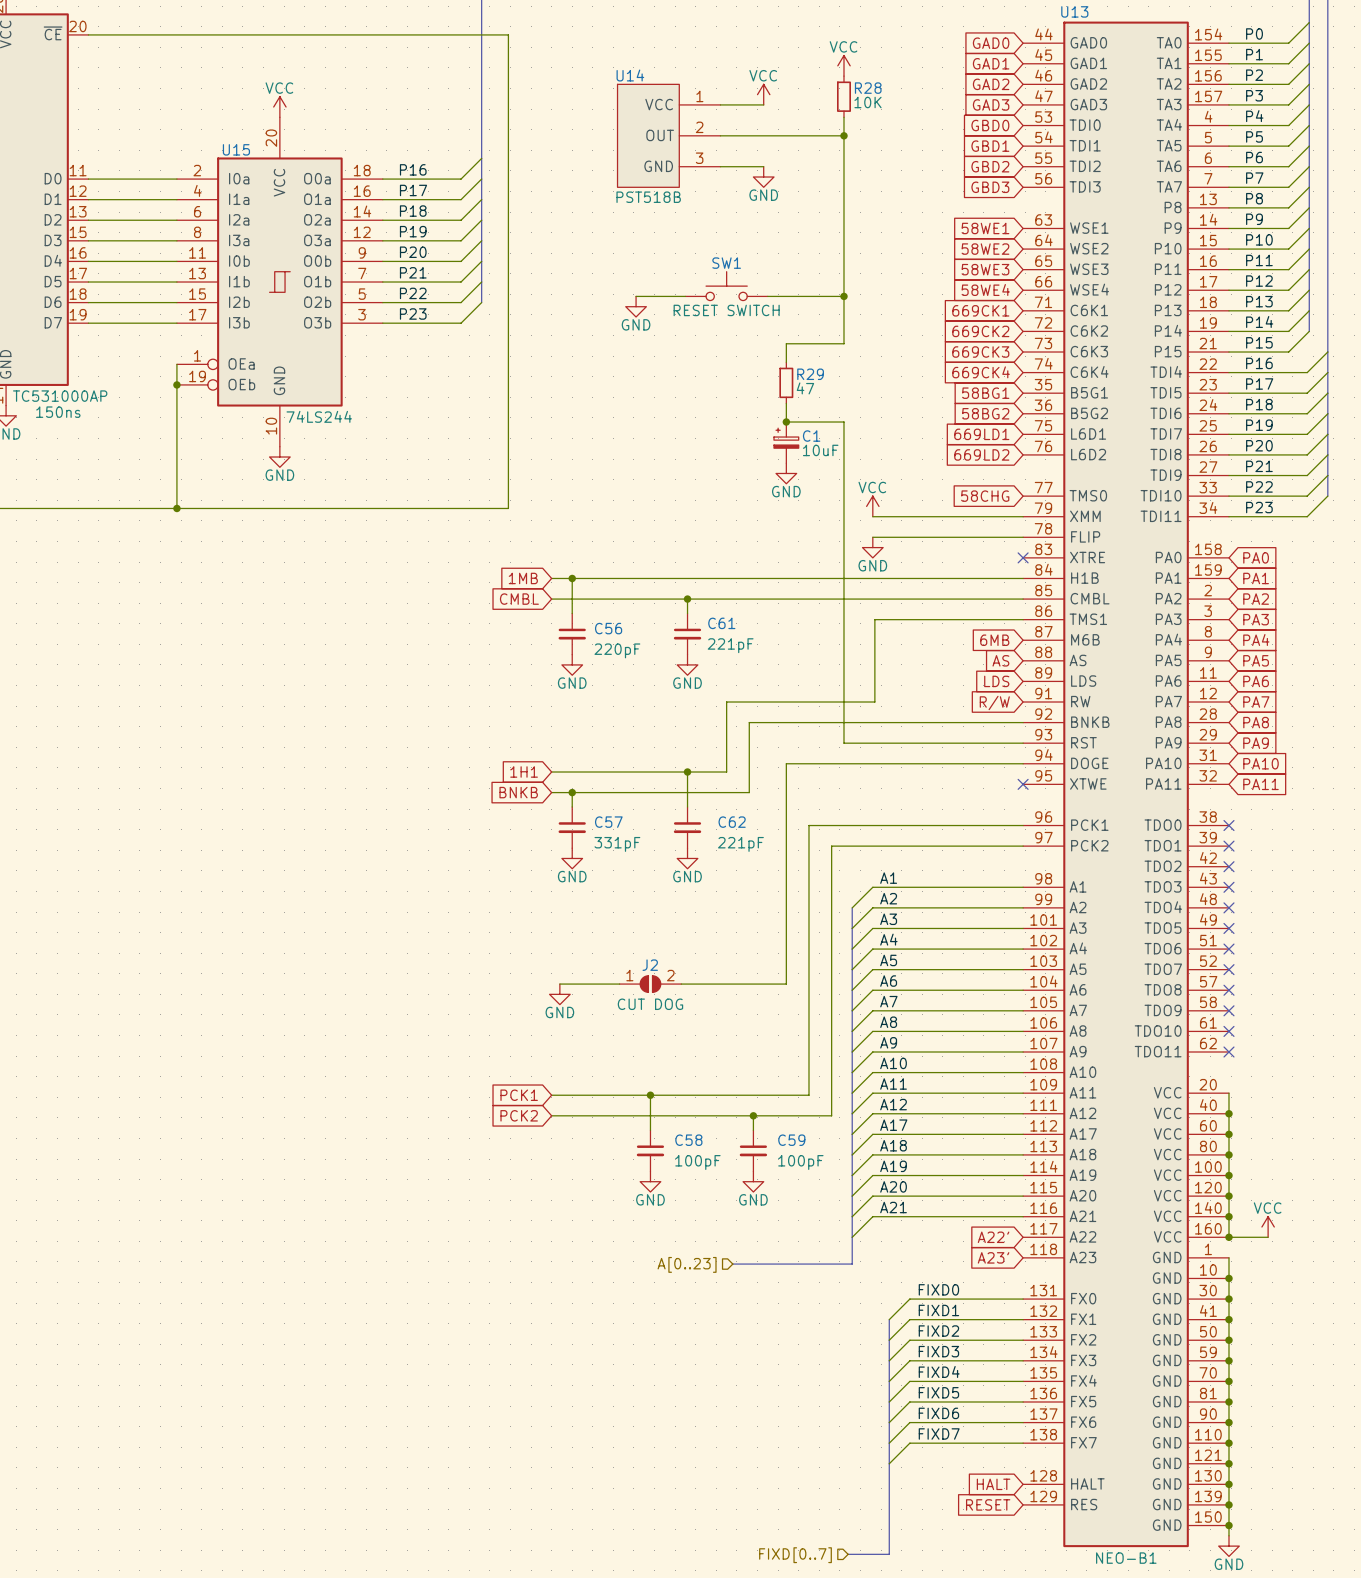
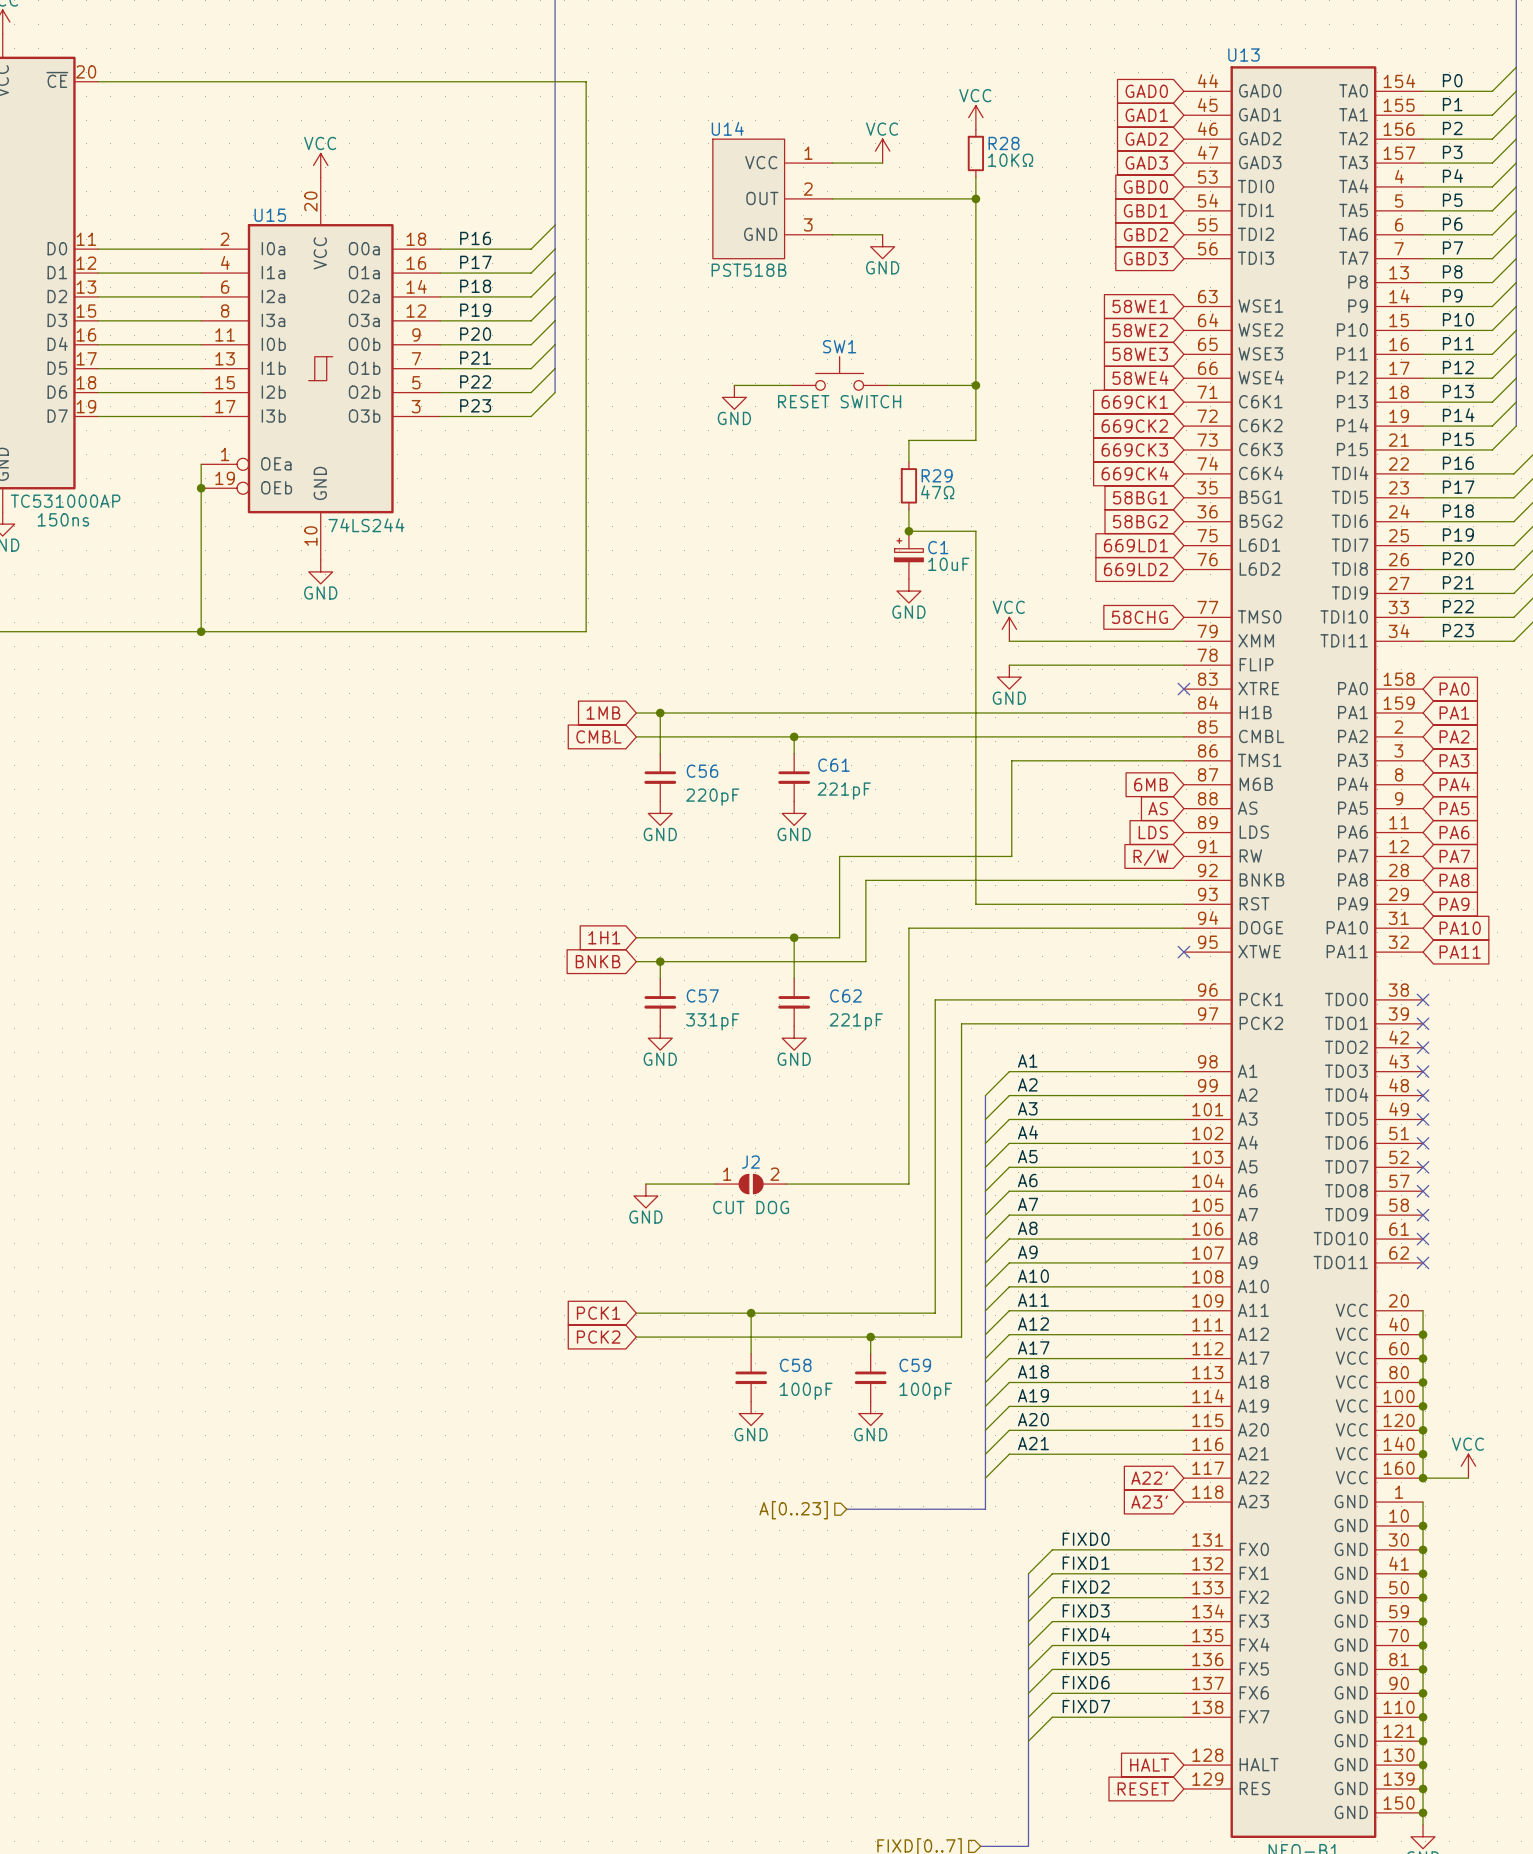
R28 value: 10K (867, 102) -> 10KΩ (1010, 160)
R29 value: 47 (805, 388) -> 47Ω (937, 492)

